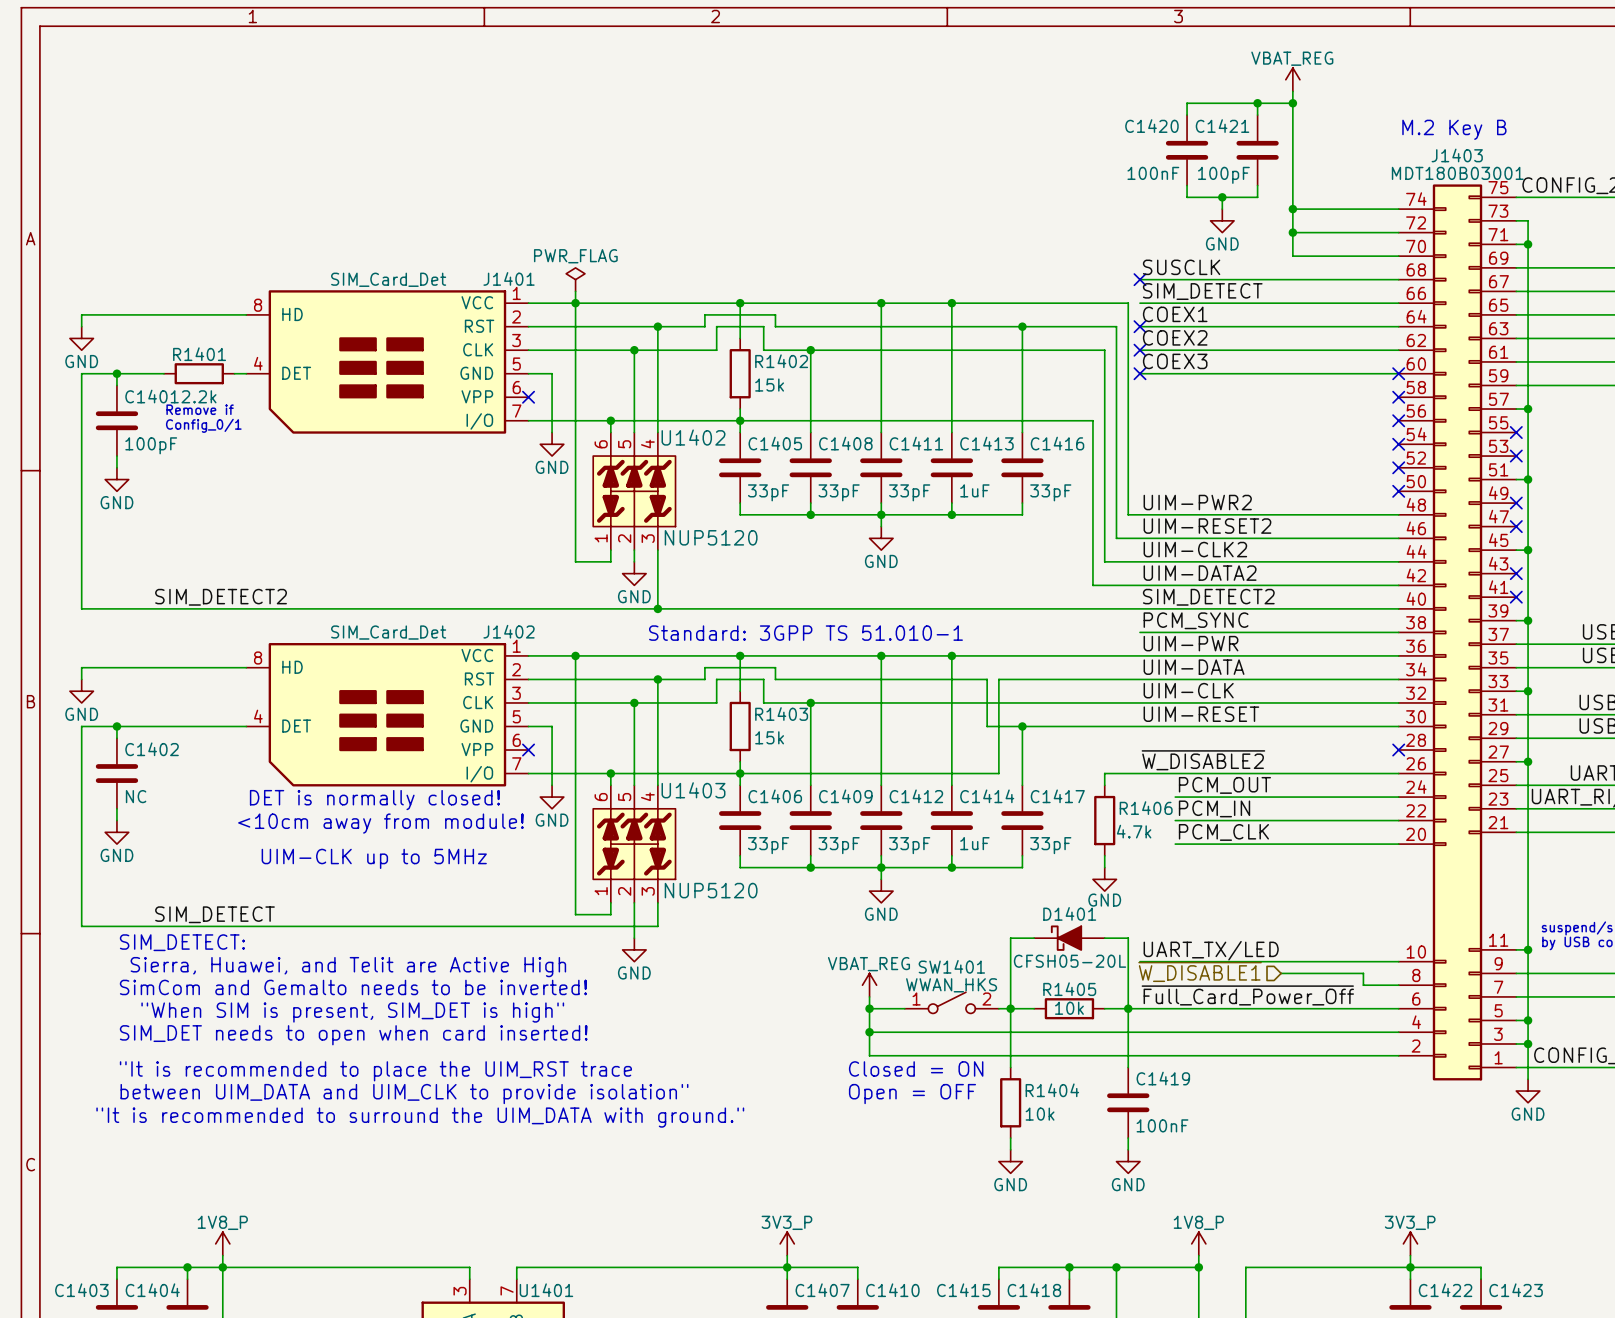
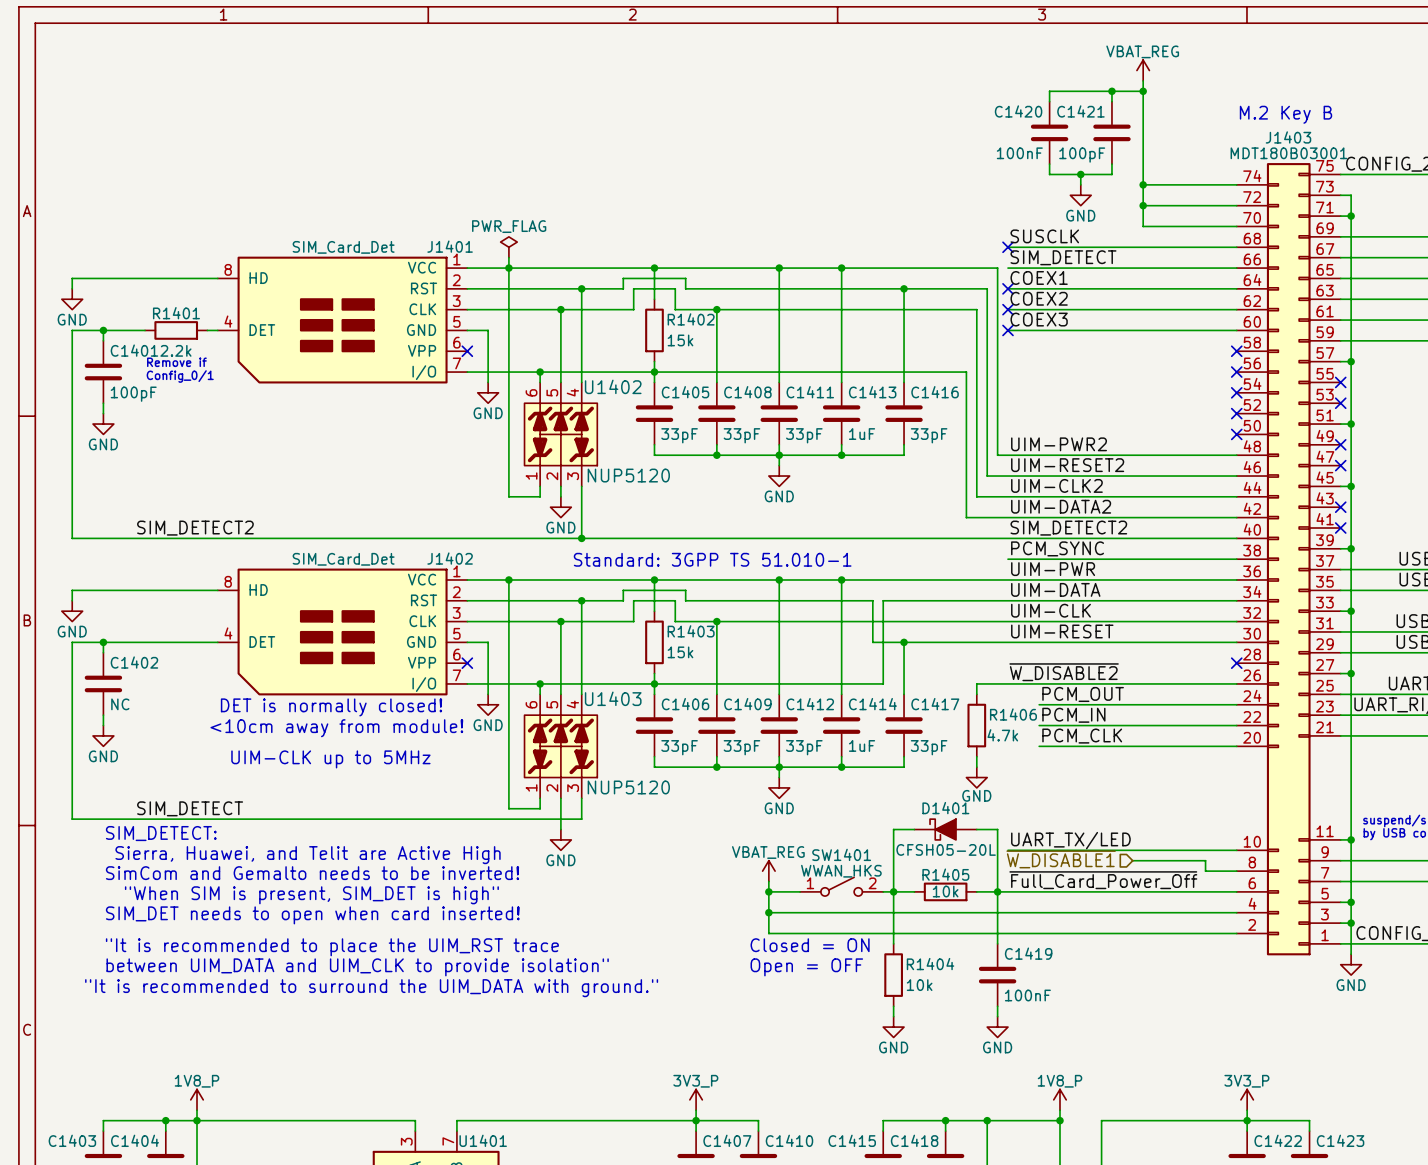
no-connect mark: (1398, 373) -> none

